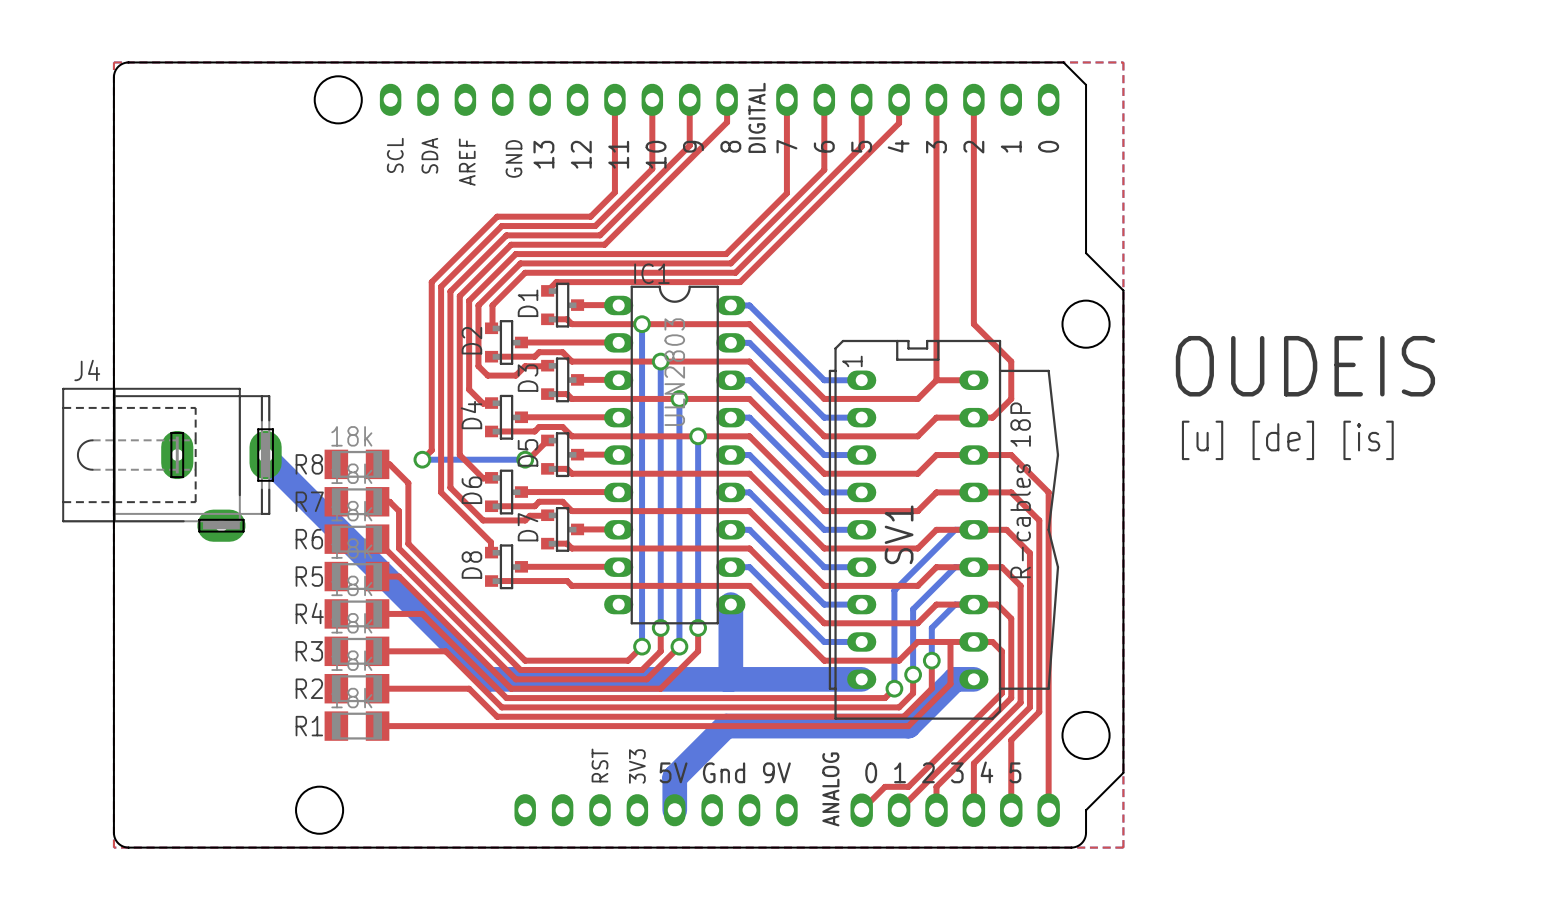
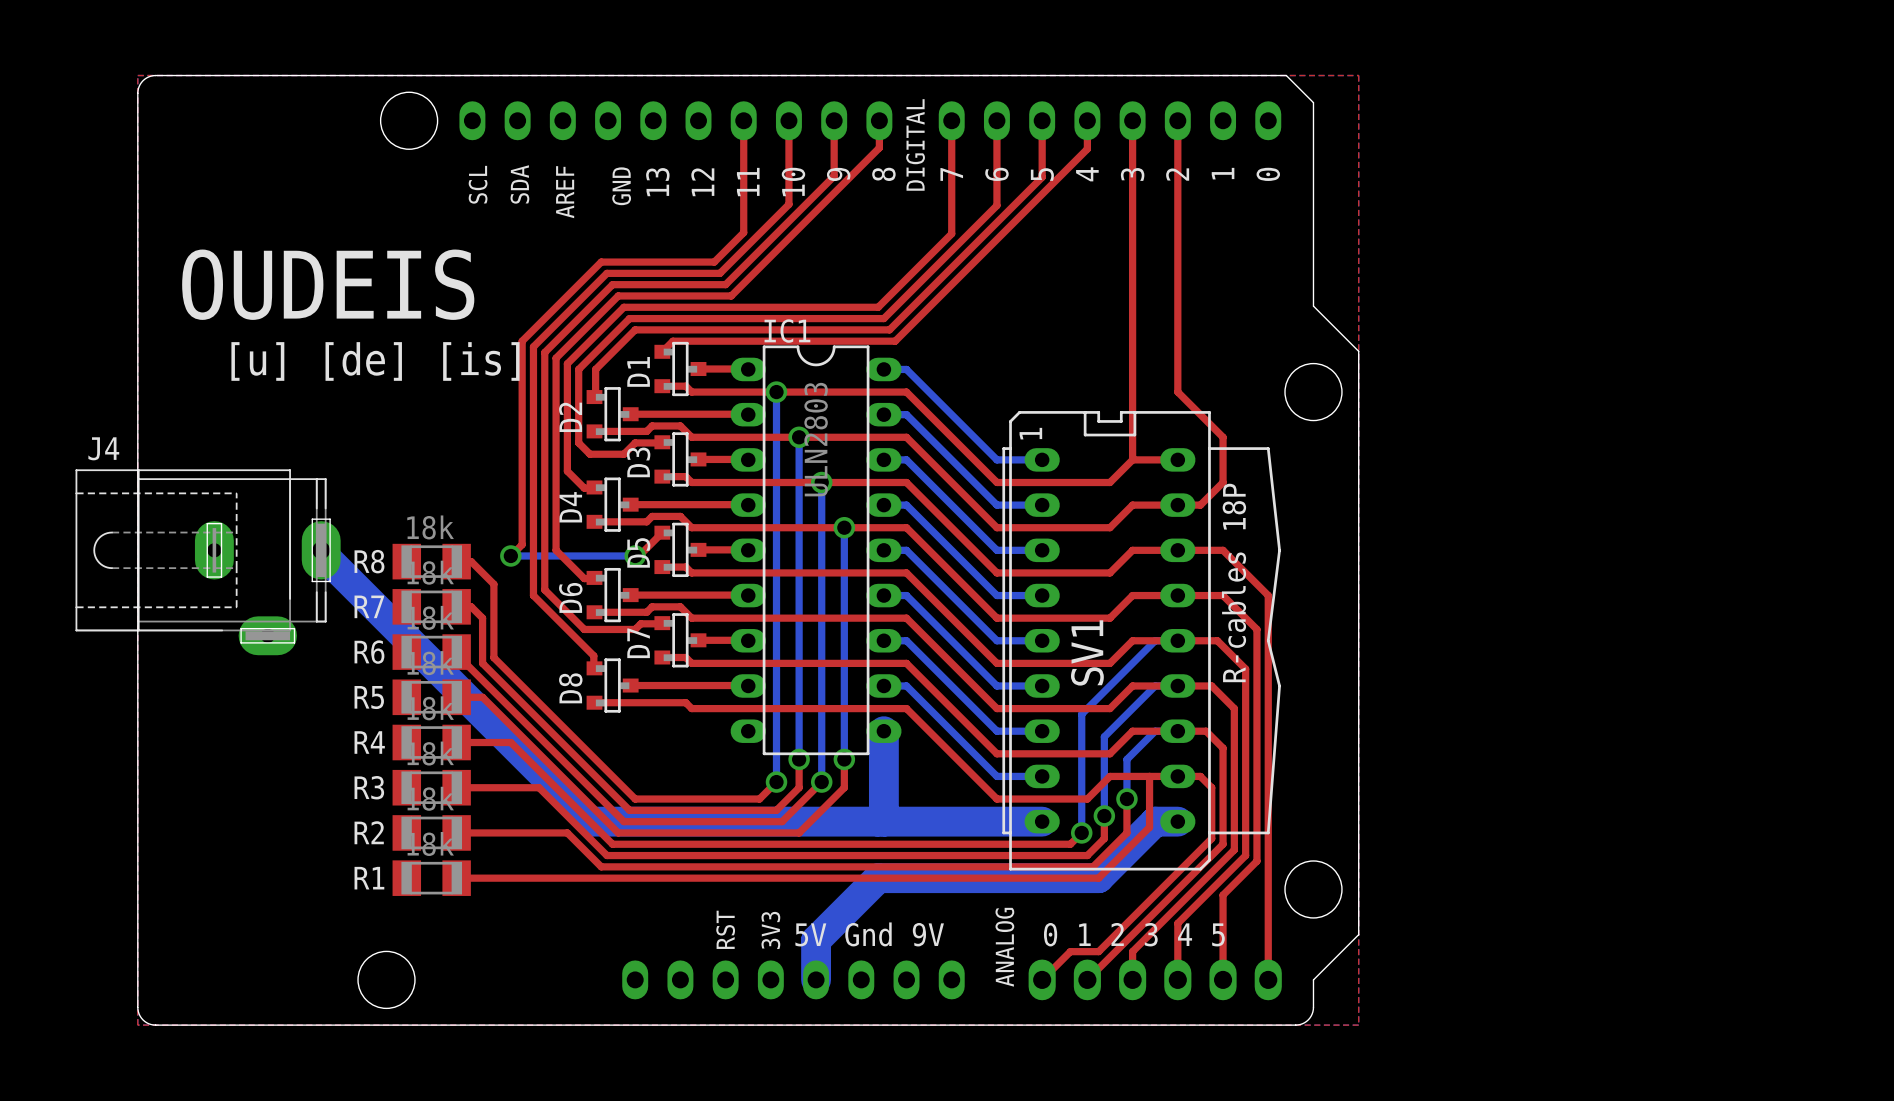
text: none -> OUDEIS (328, 284)
text: none -> [u] [de] [is] (375, 361)
text: OUDEIS (1305, 366) -> none
text: [u] [de] [is] (1287, 440) -> none

